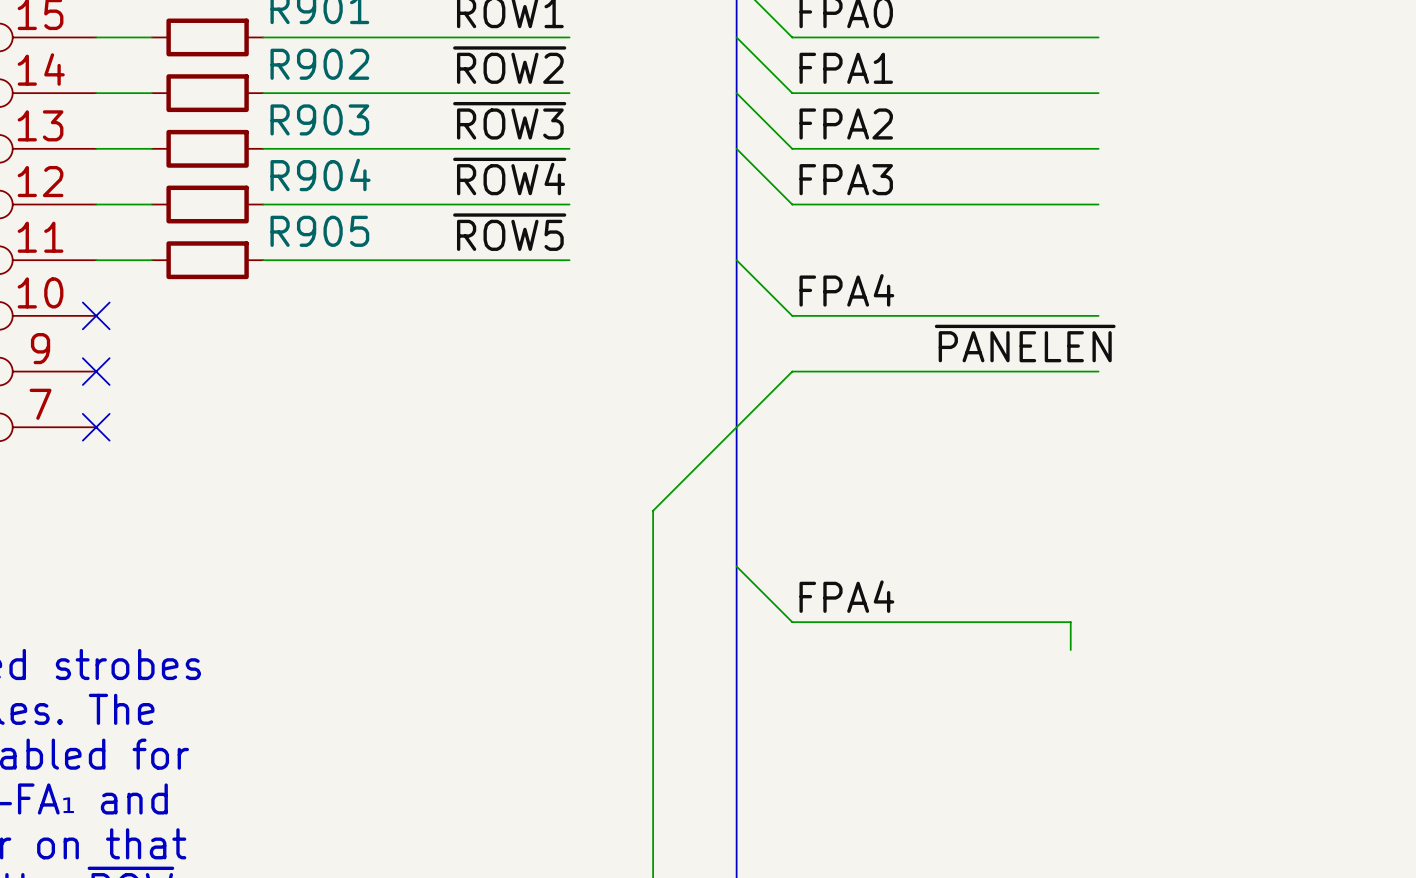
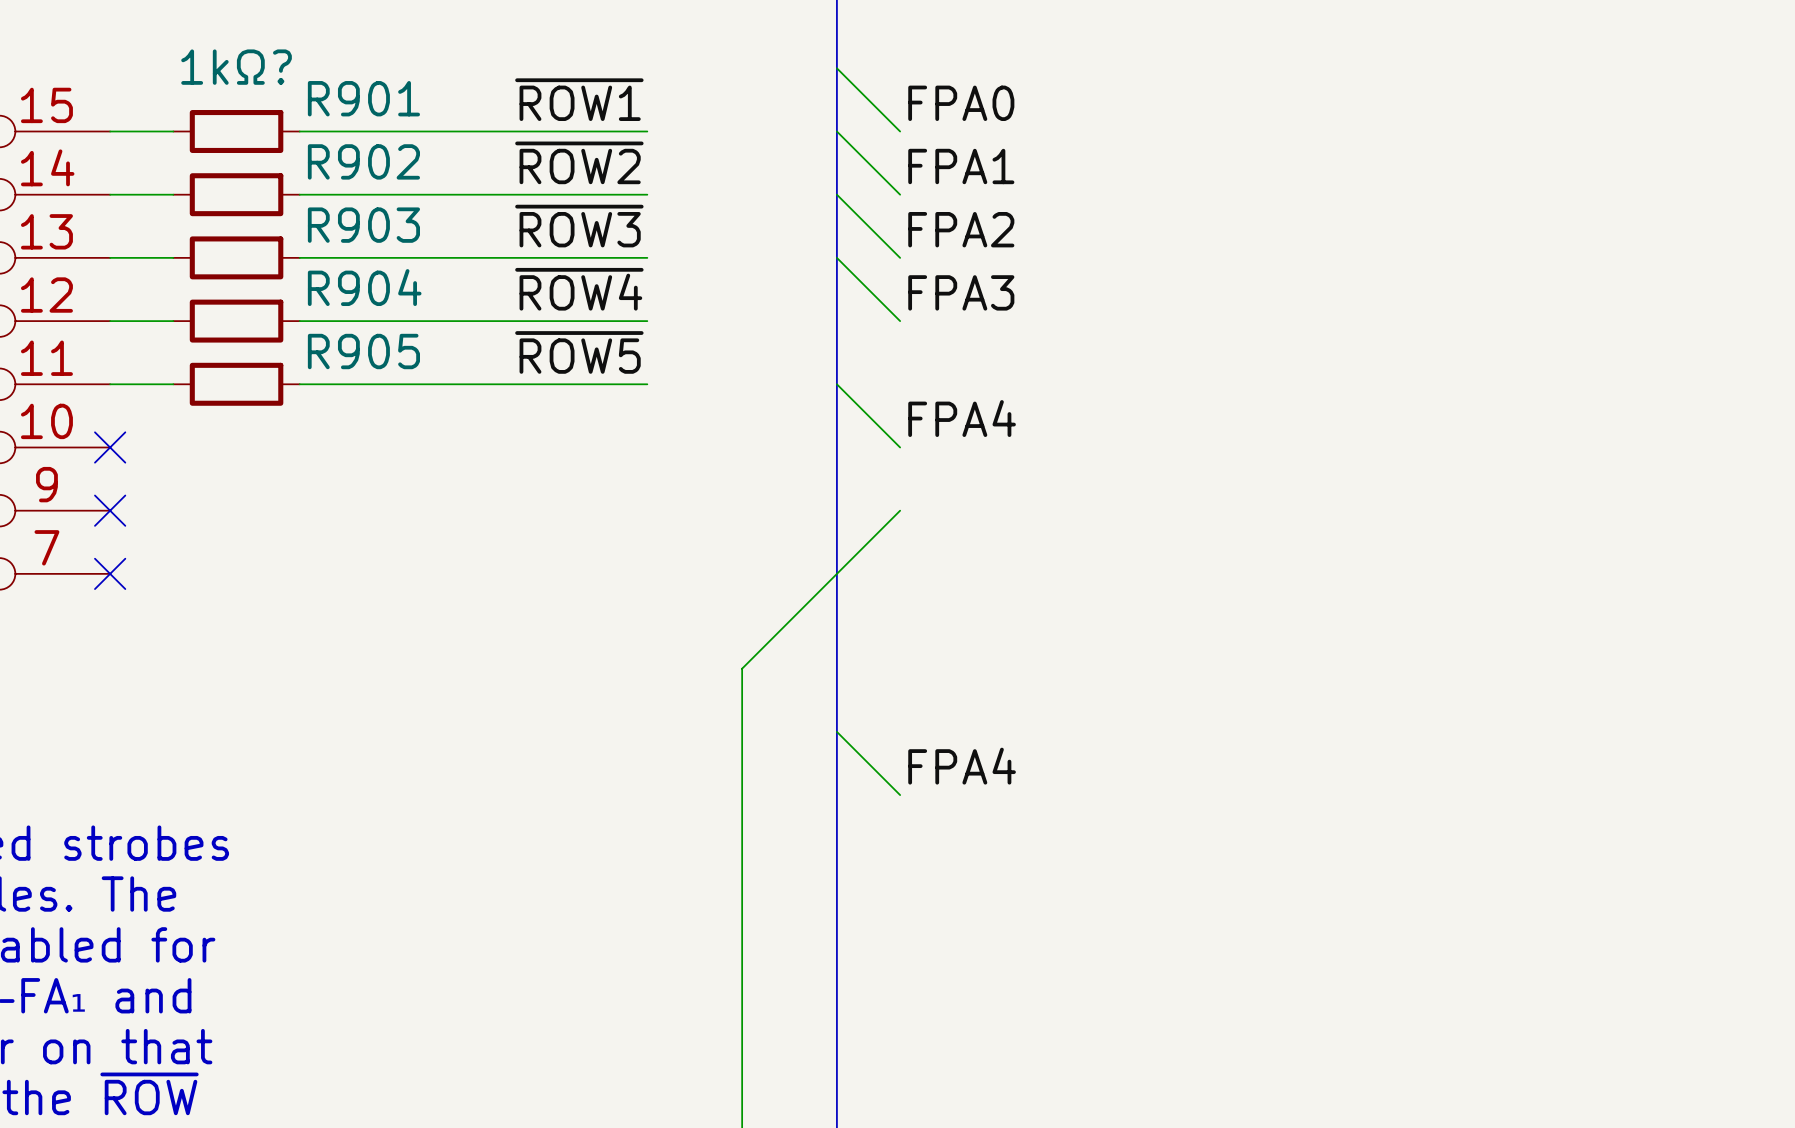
wire: (792, 37) (1098, 37) -> none
wire: (792, 93) (1098, 93) -> none
wire: (792, 148) (1098, 148) -> none
wire: (792, 204) (1098, 204) -> none
wire: (792, 315) (1098, 315) -> none
label: ~{PANELEN} (1025, 343) -> none
wire: (792, 371) (1098, 371) -> none
wire: (792, 622) (1070, 622) (1070, 650) -> none

